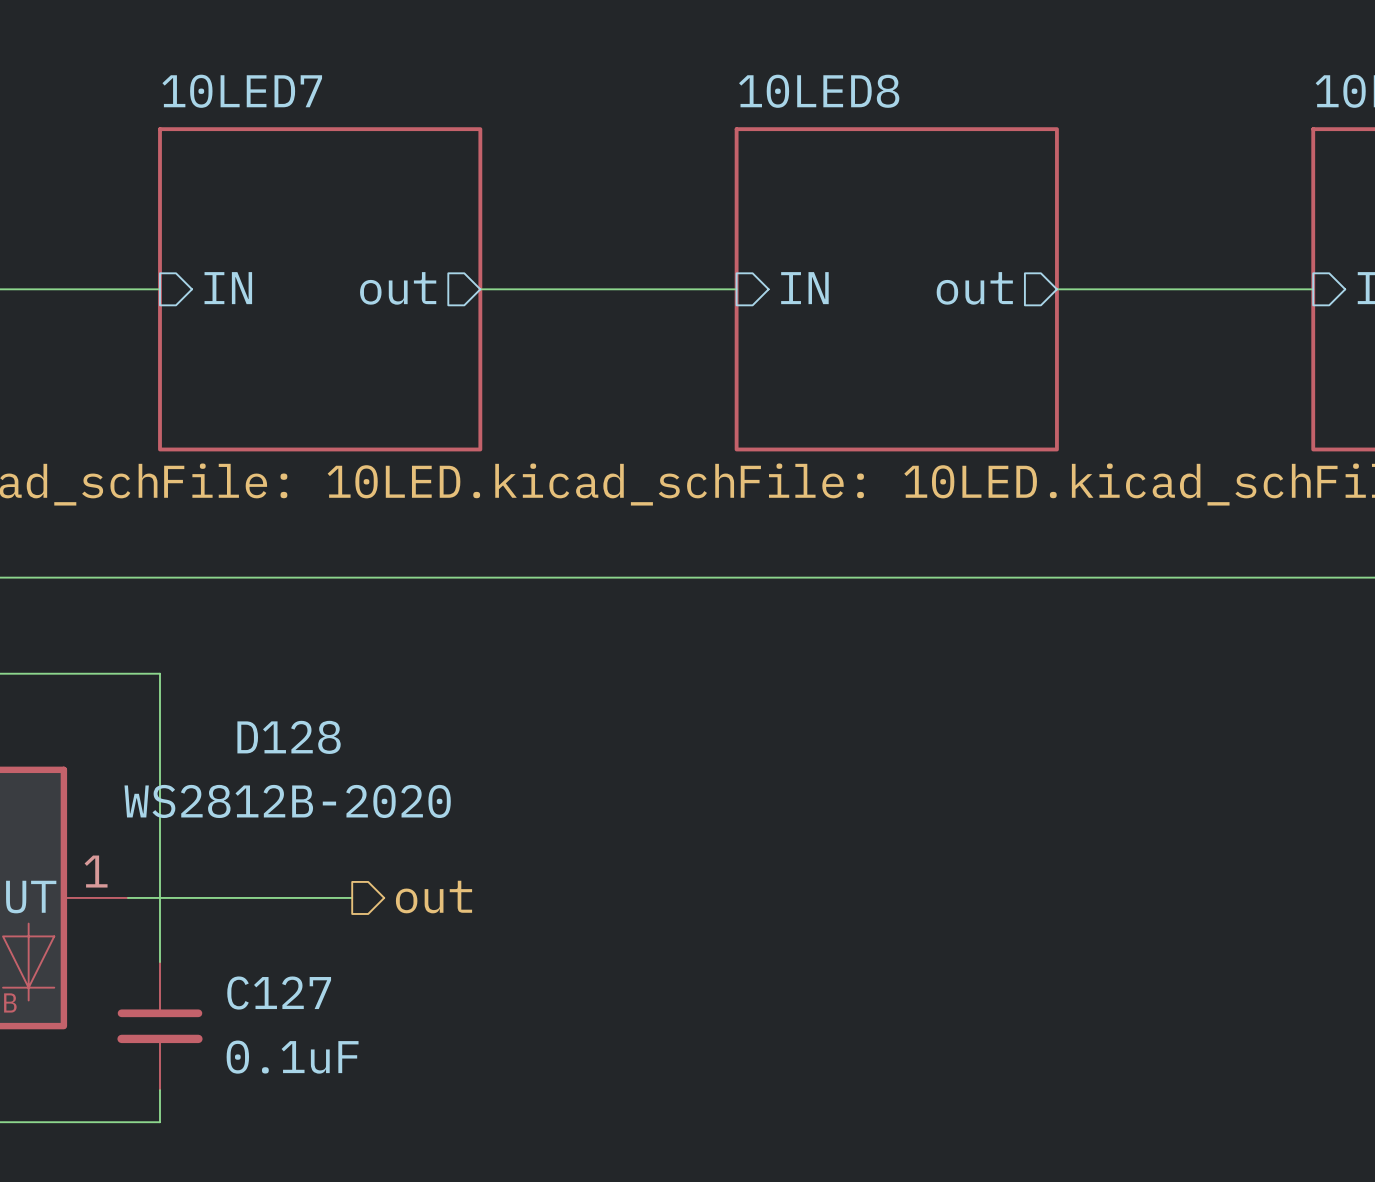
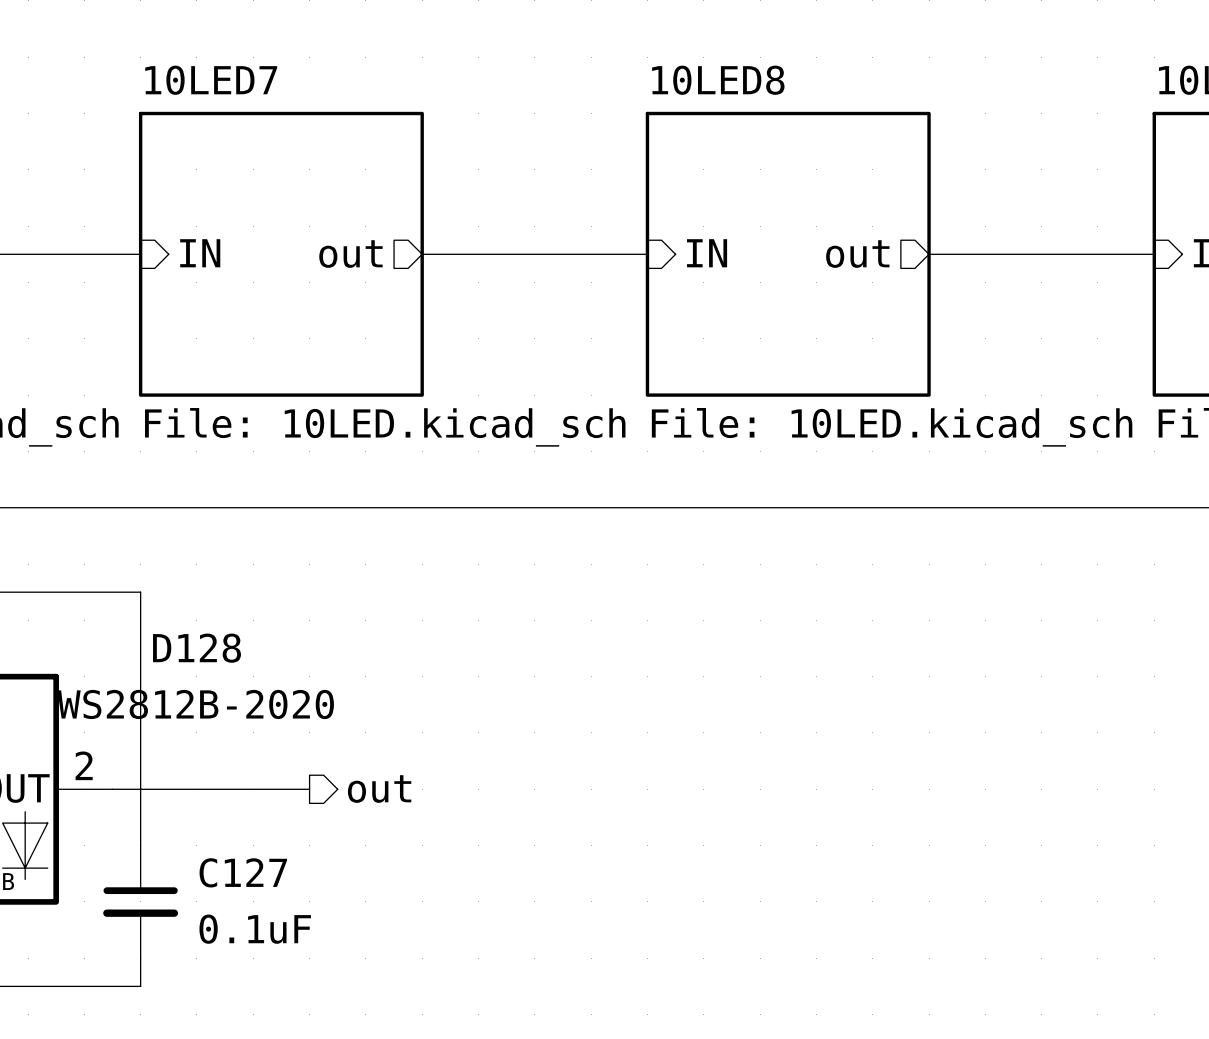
D128 name position: D128 (289, 737) -> D128 (197, 648)
D128 value position: WS2812B-2020 (287, 801) -> WS2812B-2020 (195, 704)
D128 pin number: 1 (96, 871) -> 2 (84, 765)

